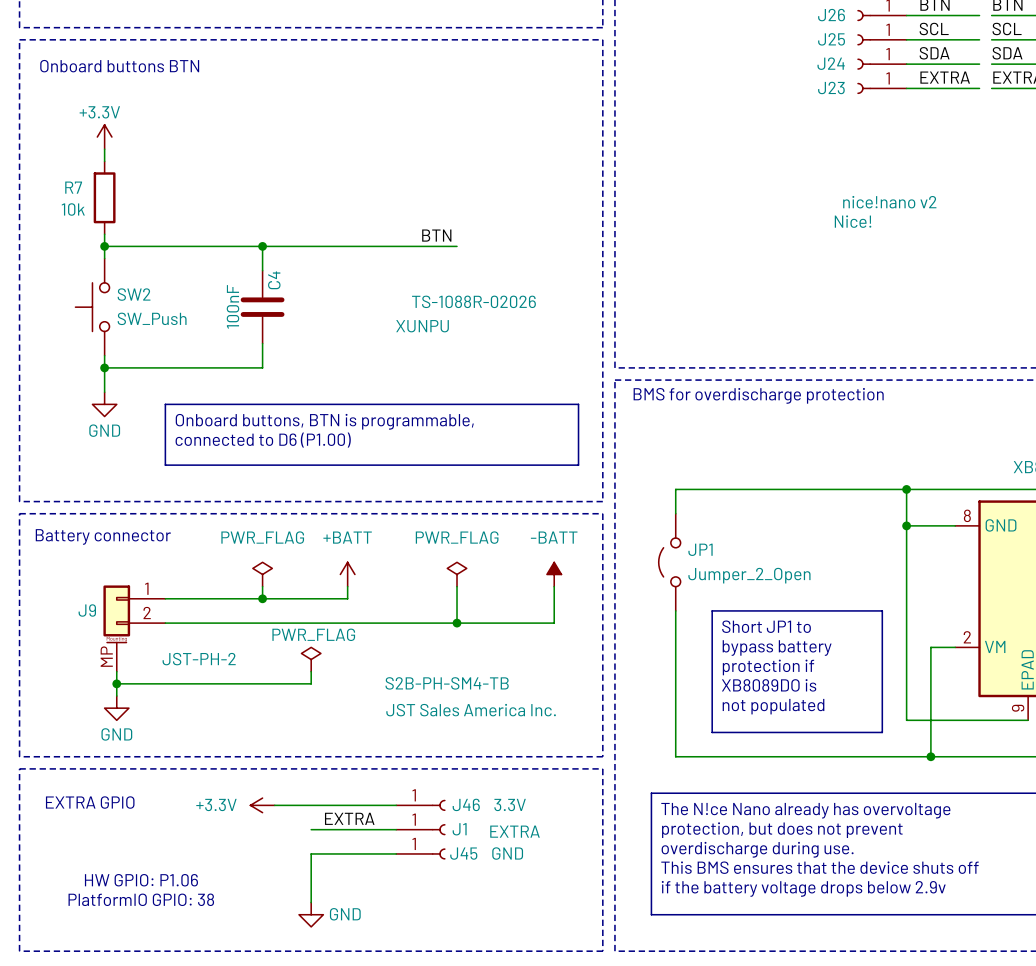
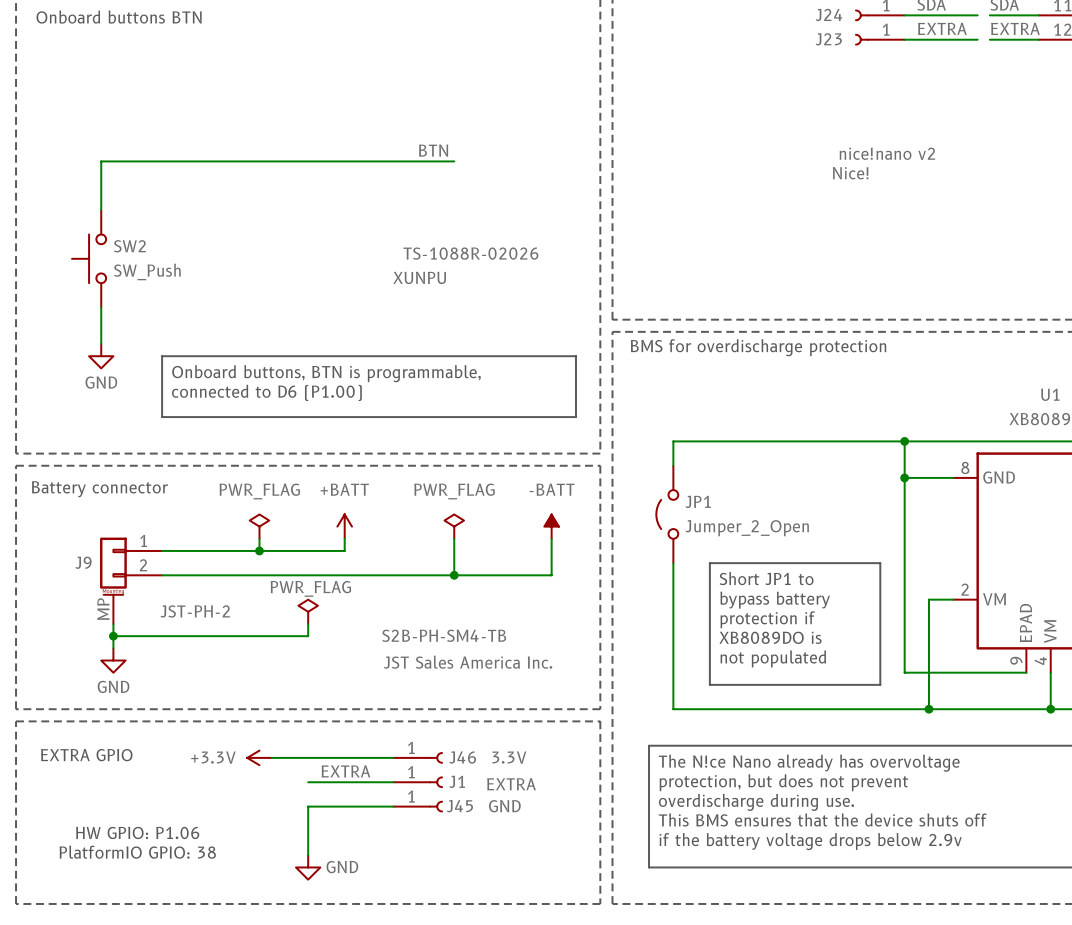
power symbol: +3.3V (104, 137) -> none
wire: (104, 149) (104, 161) -> none
R7: 10k (104, 197) -> none
wire: none -> (454, 161) (101, 161) (101, 185)
label position: BTN (436, 235) -> BTN (433, 150)
wire: (104, 246) (457, 246) -> none
junction: (104, 246) -> none
wire: (262, 246) (262, 270) -> none
junction: (262, 246) -> none
C4: 100nF (262, 307) -> none
wire: (262, 343) (262, 367) (104, 367) -> none
junction: (104, 367) -> none

